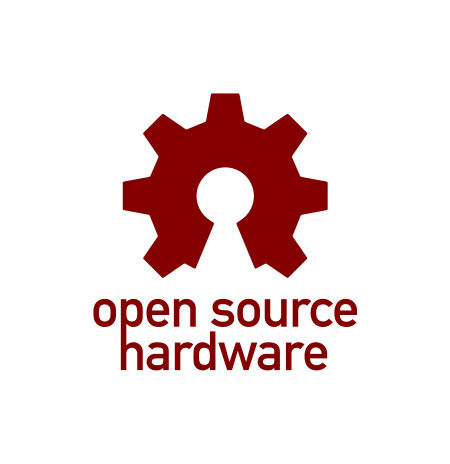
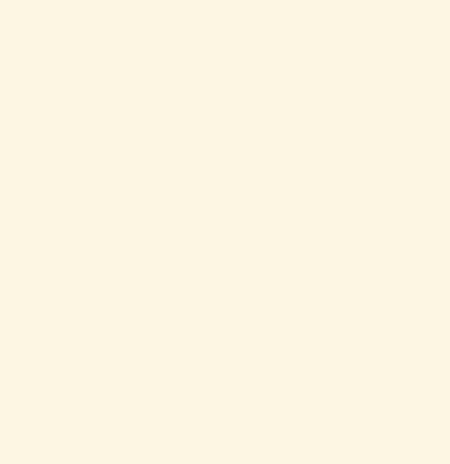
part: (225, 231) -> none

